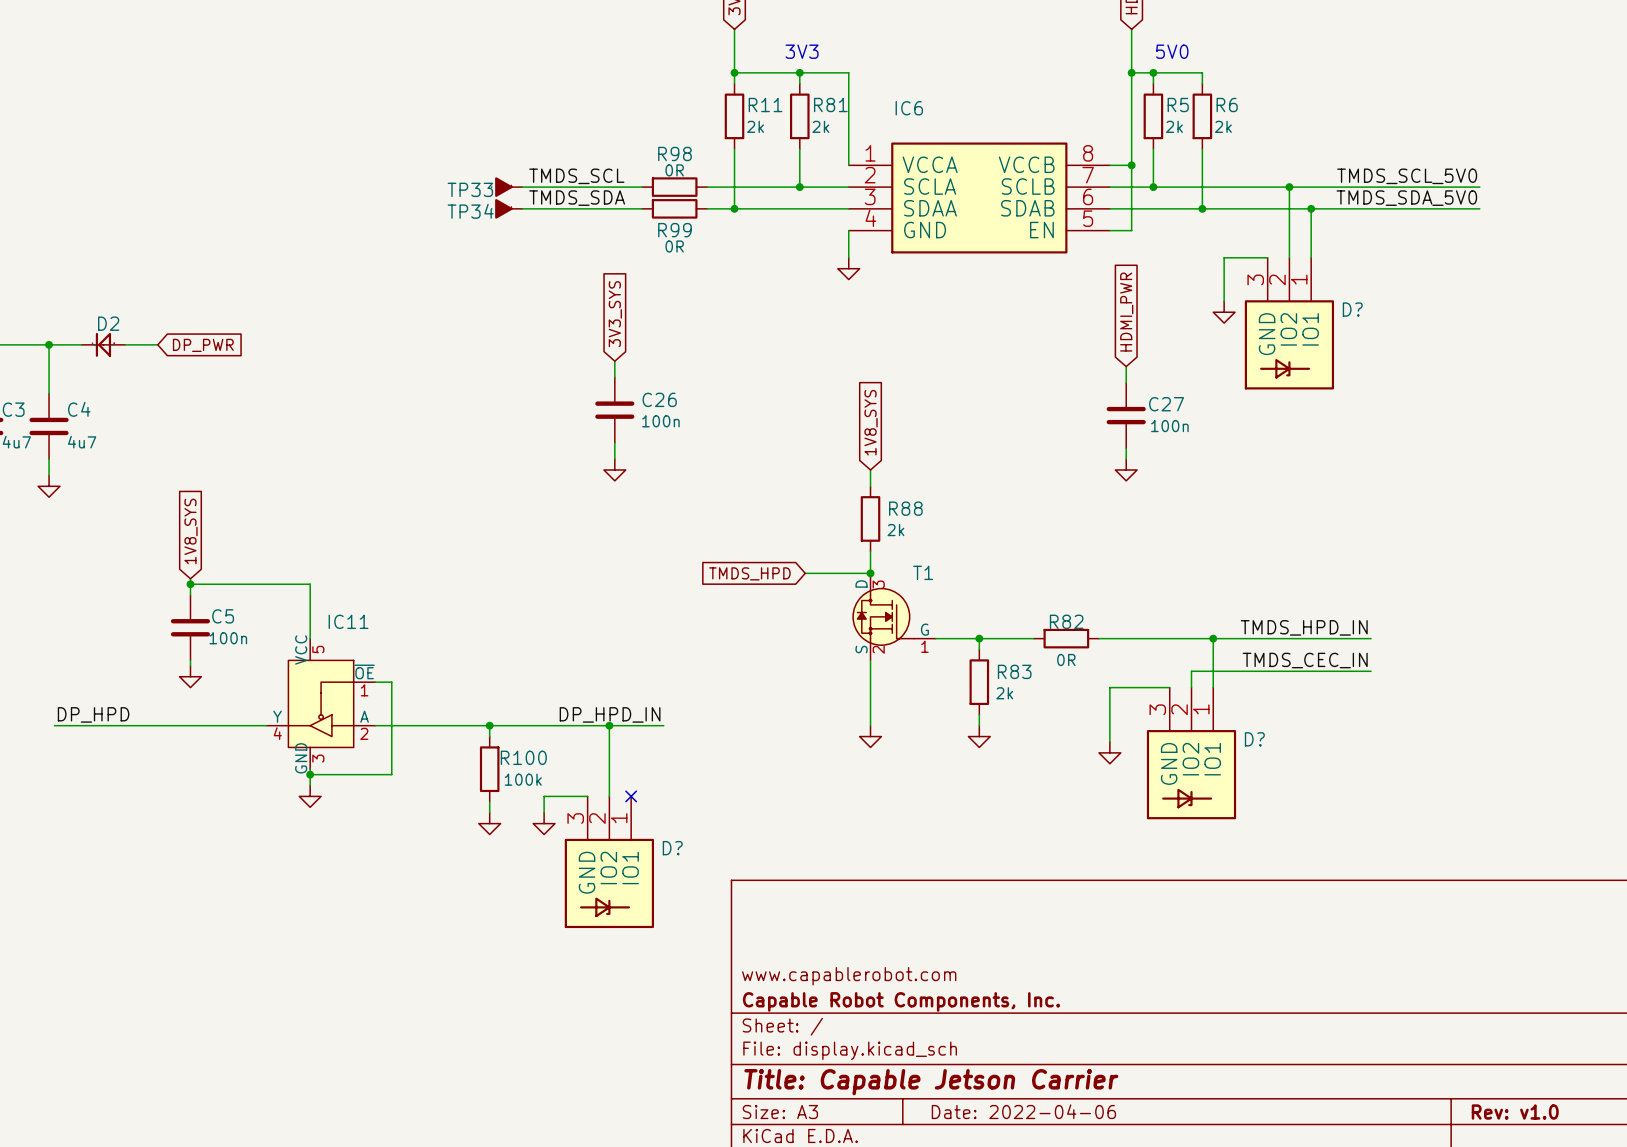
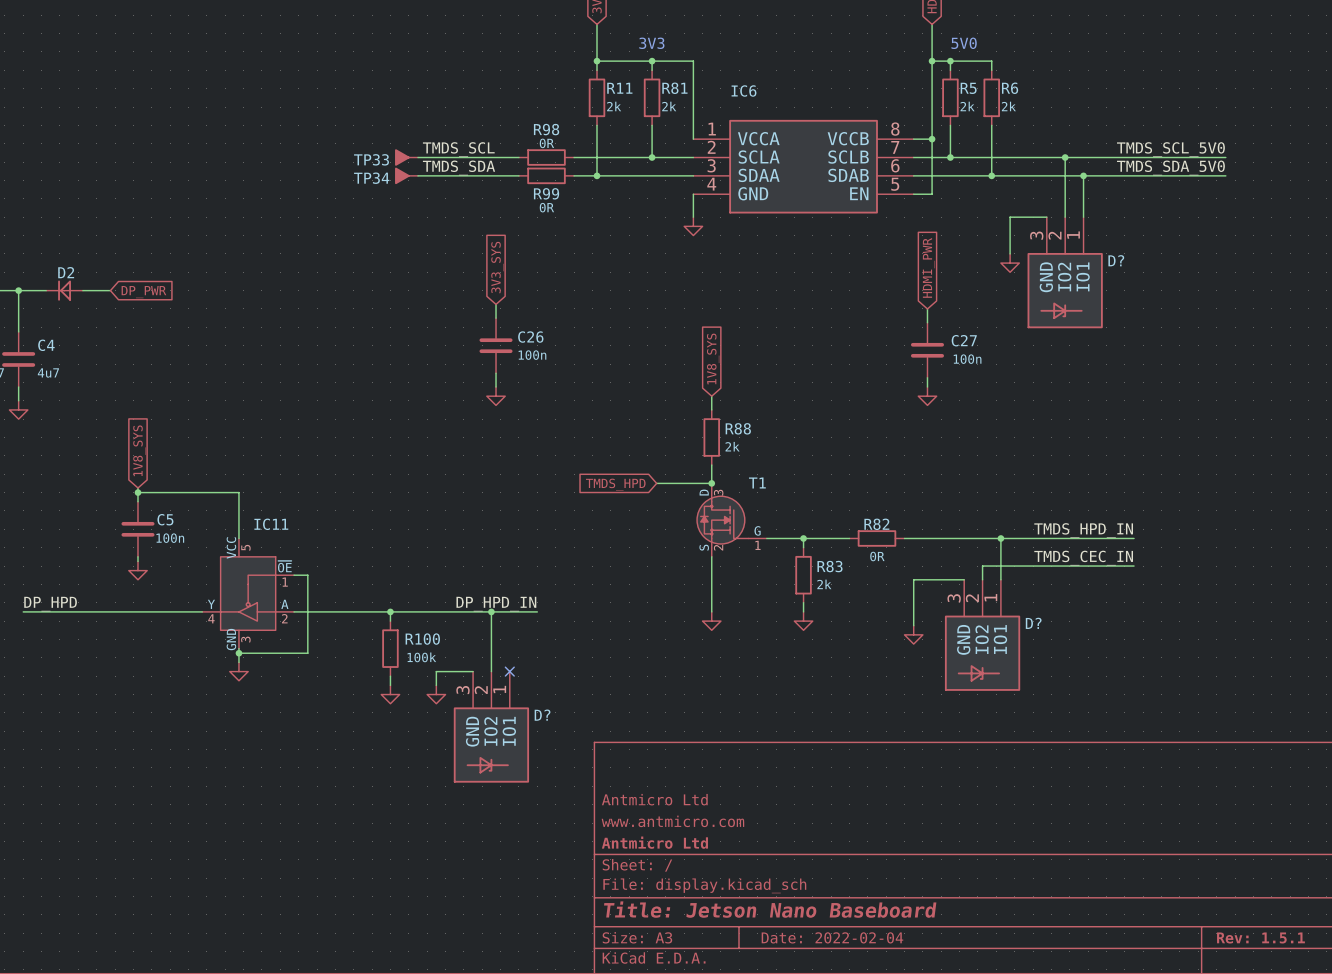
title block: none -> Antmicro Ltd (654, 799)
title block: www.capablerobot.com (849, 976) -> www.antmicro.com (672, 821)
title block: Capable Robot Components, Inc. (901, 1001) -> Antmicro Ltd (654, 842)
title block: Title: Capable Jetson Carrier (931, 1082) -> Title: Jetson Nano Baseboard (770, 909)
title block: Date: 2022-04-06 (1023, 1111) -> Date: 2022-02-04 (832, 937)
title block: Rev: v1.0 (1515, 1112) -> Rev: 1.5.1 (1260, 937)

